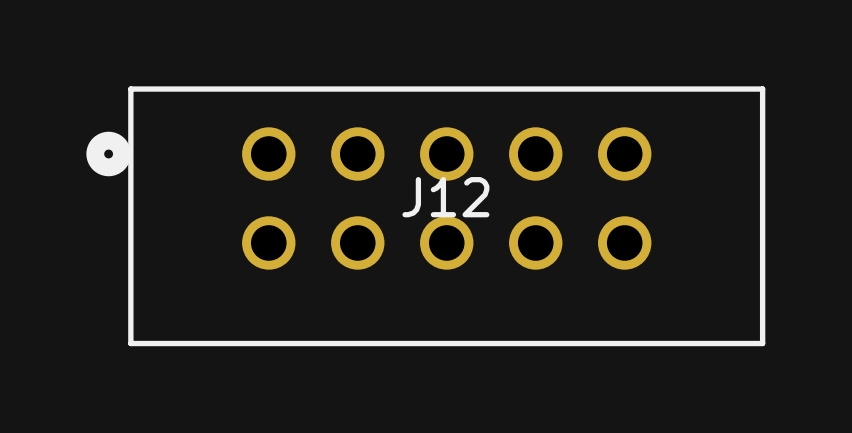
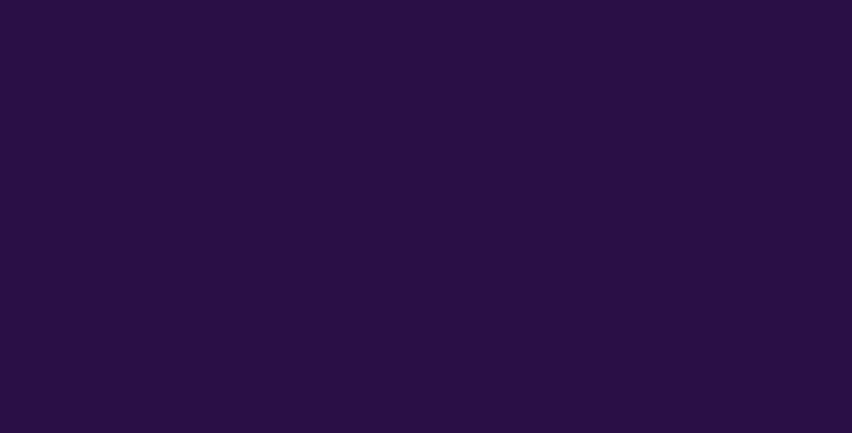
J12: (425, 216) -> none

